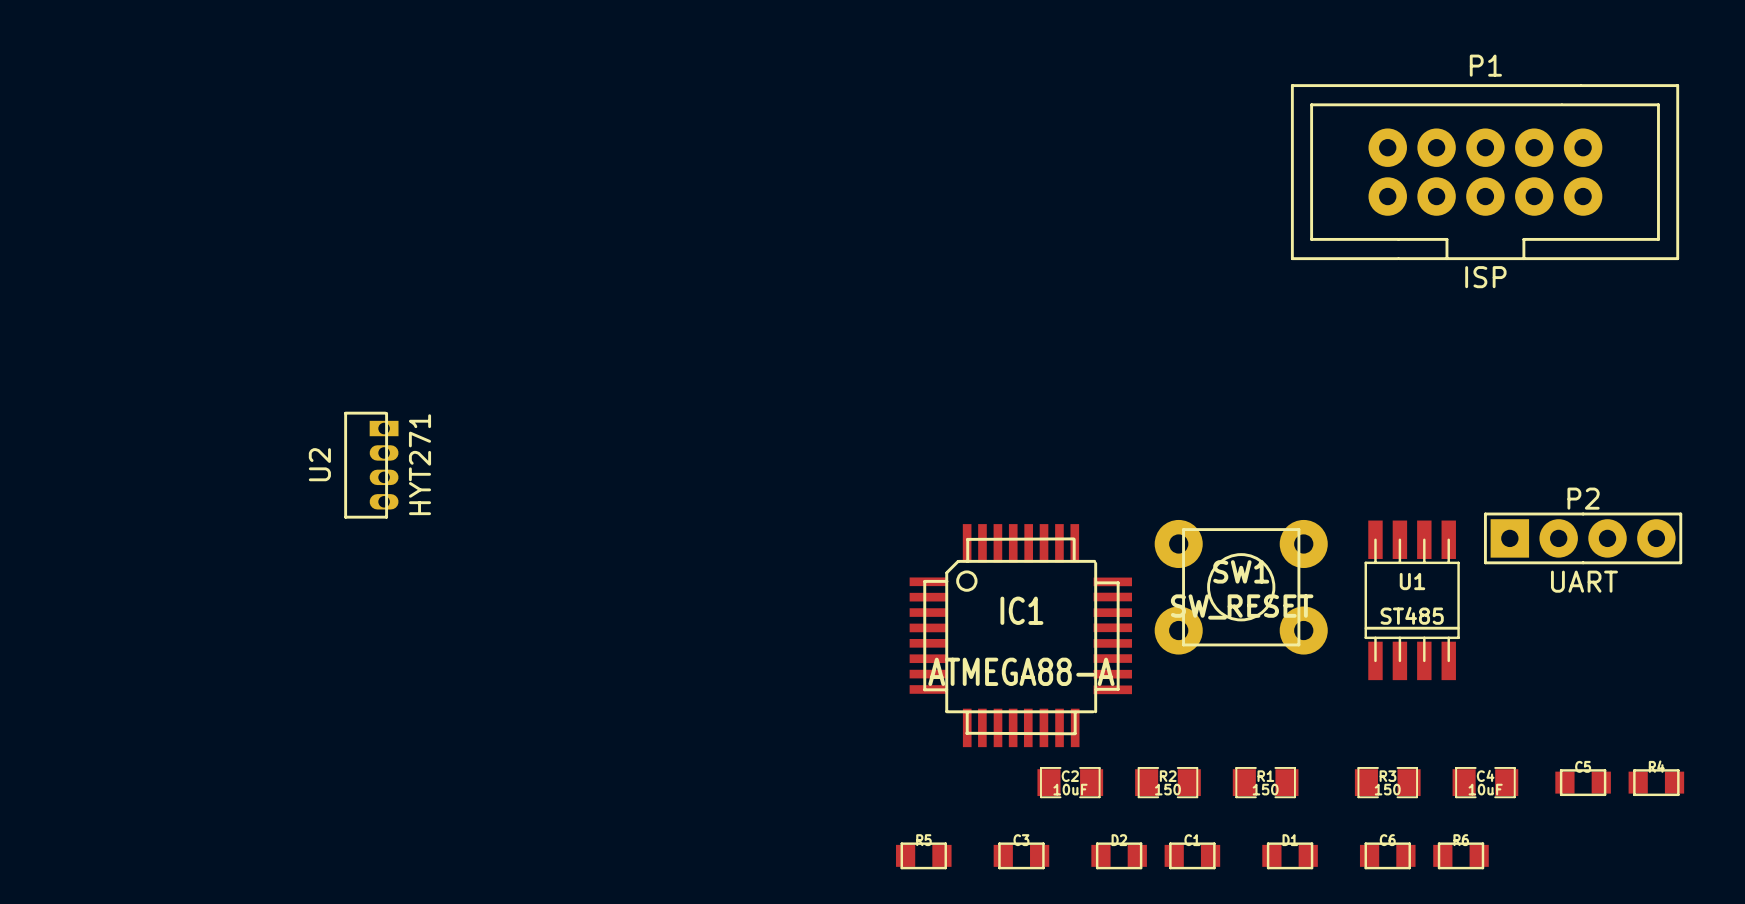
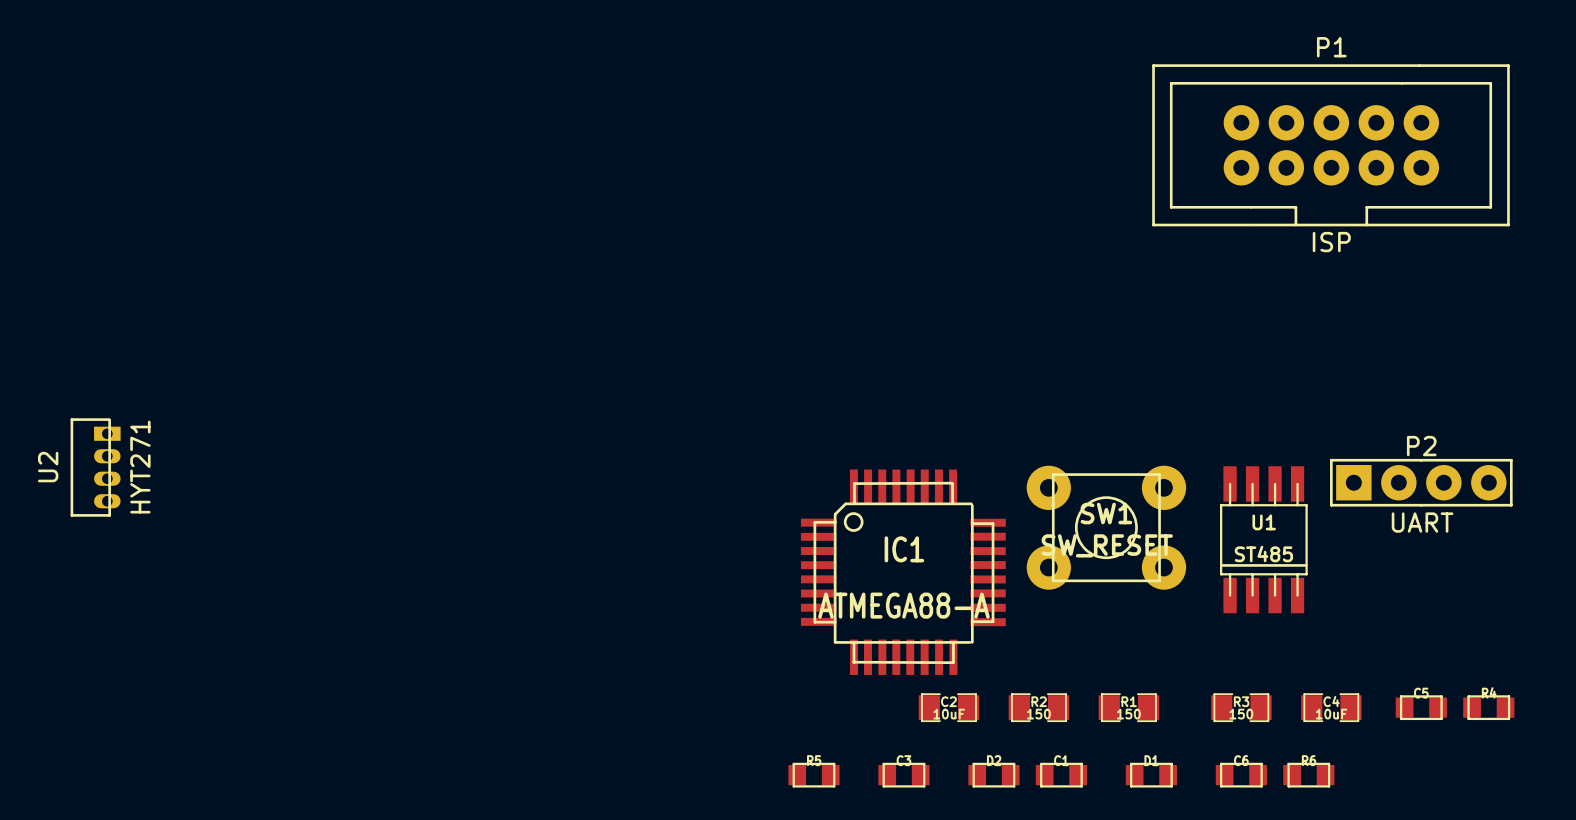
U2 position: (371, 465) -> (95, 467)

